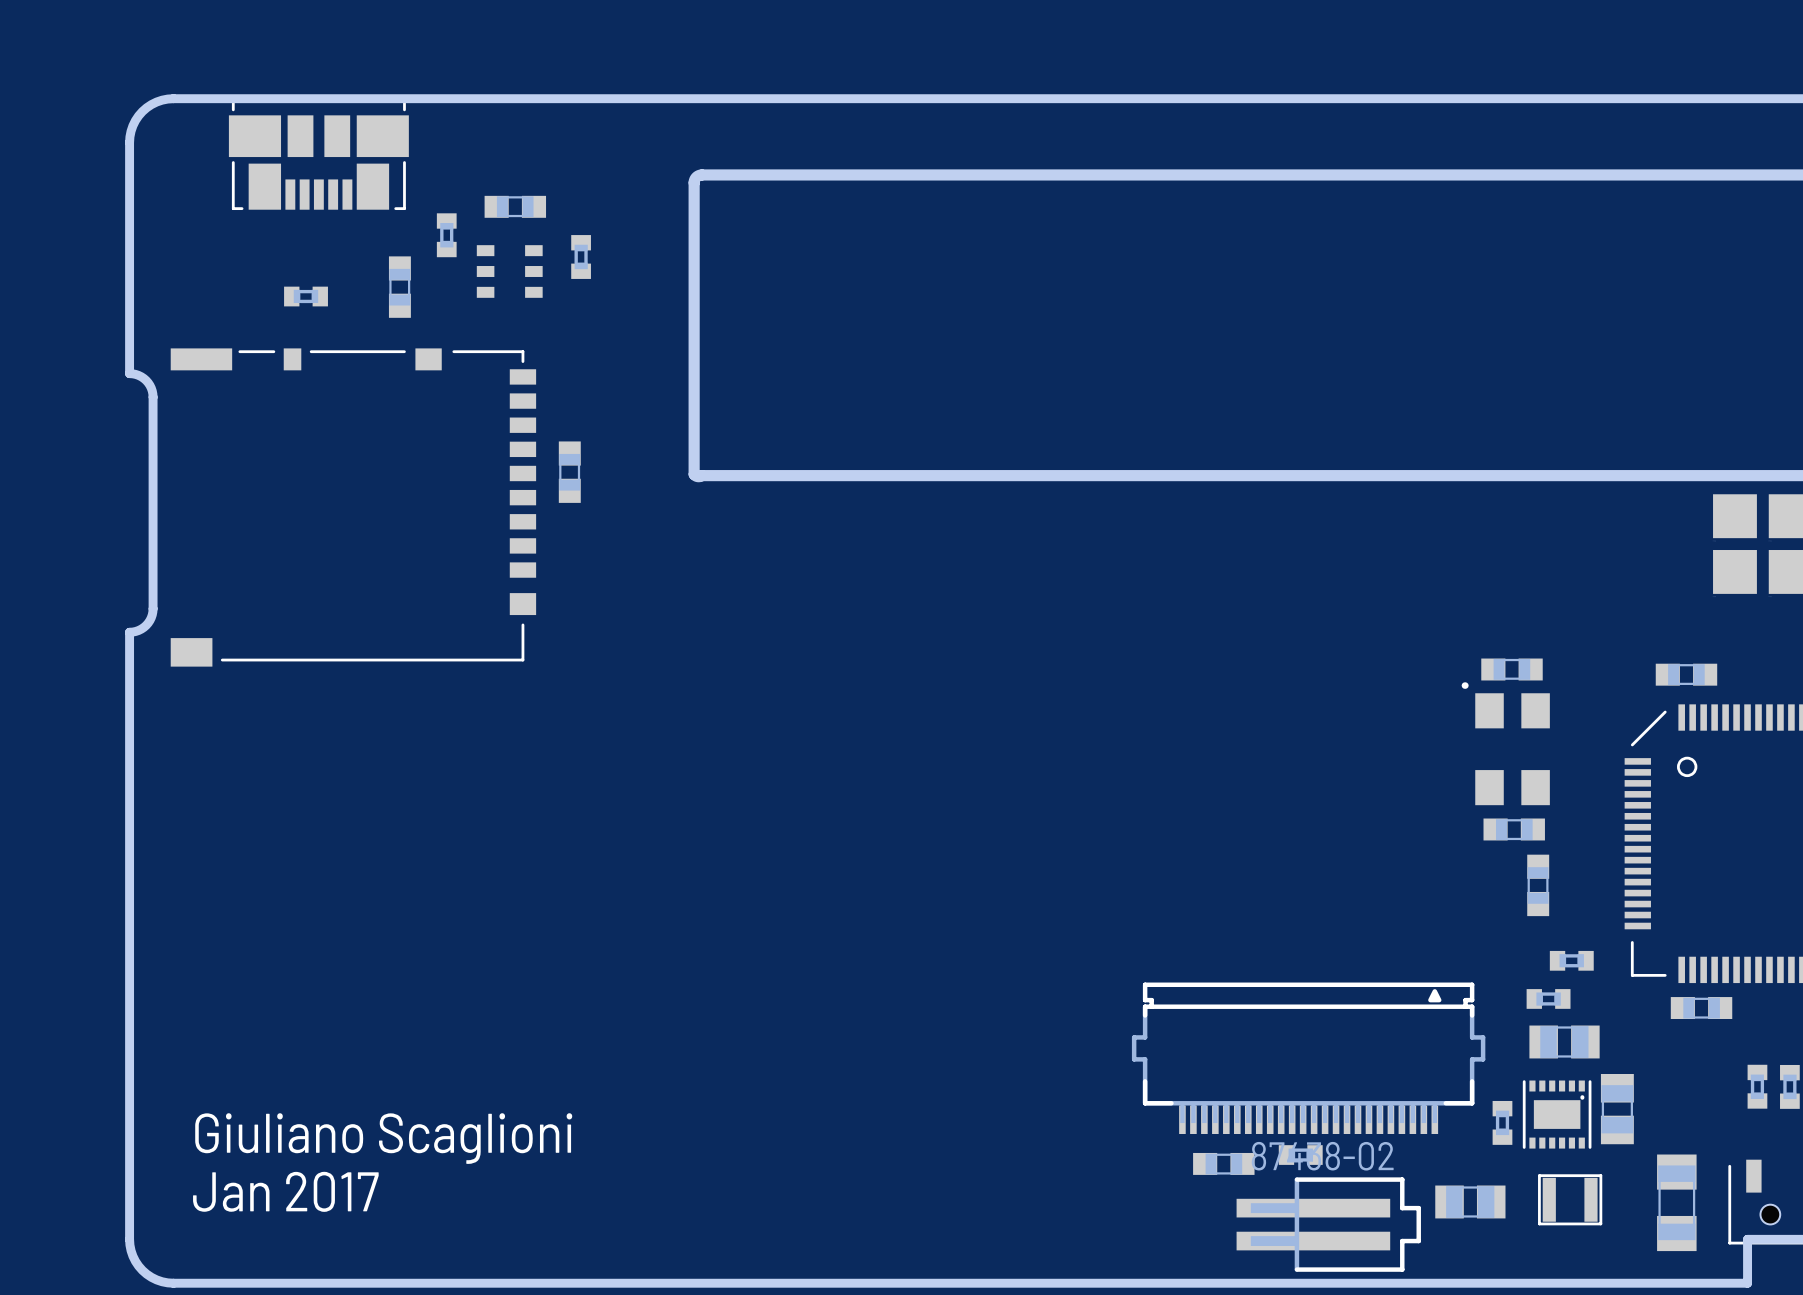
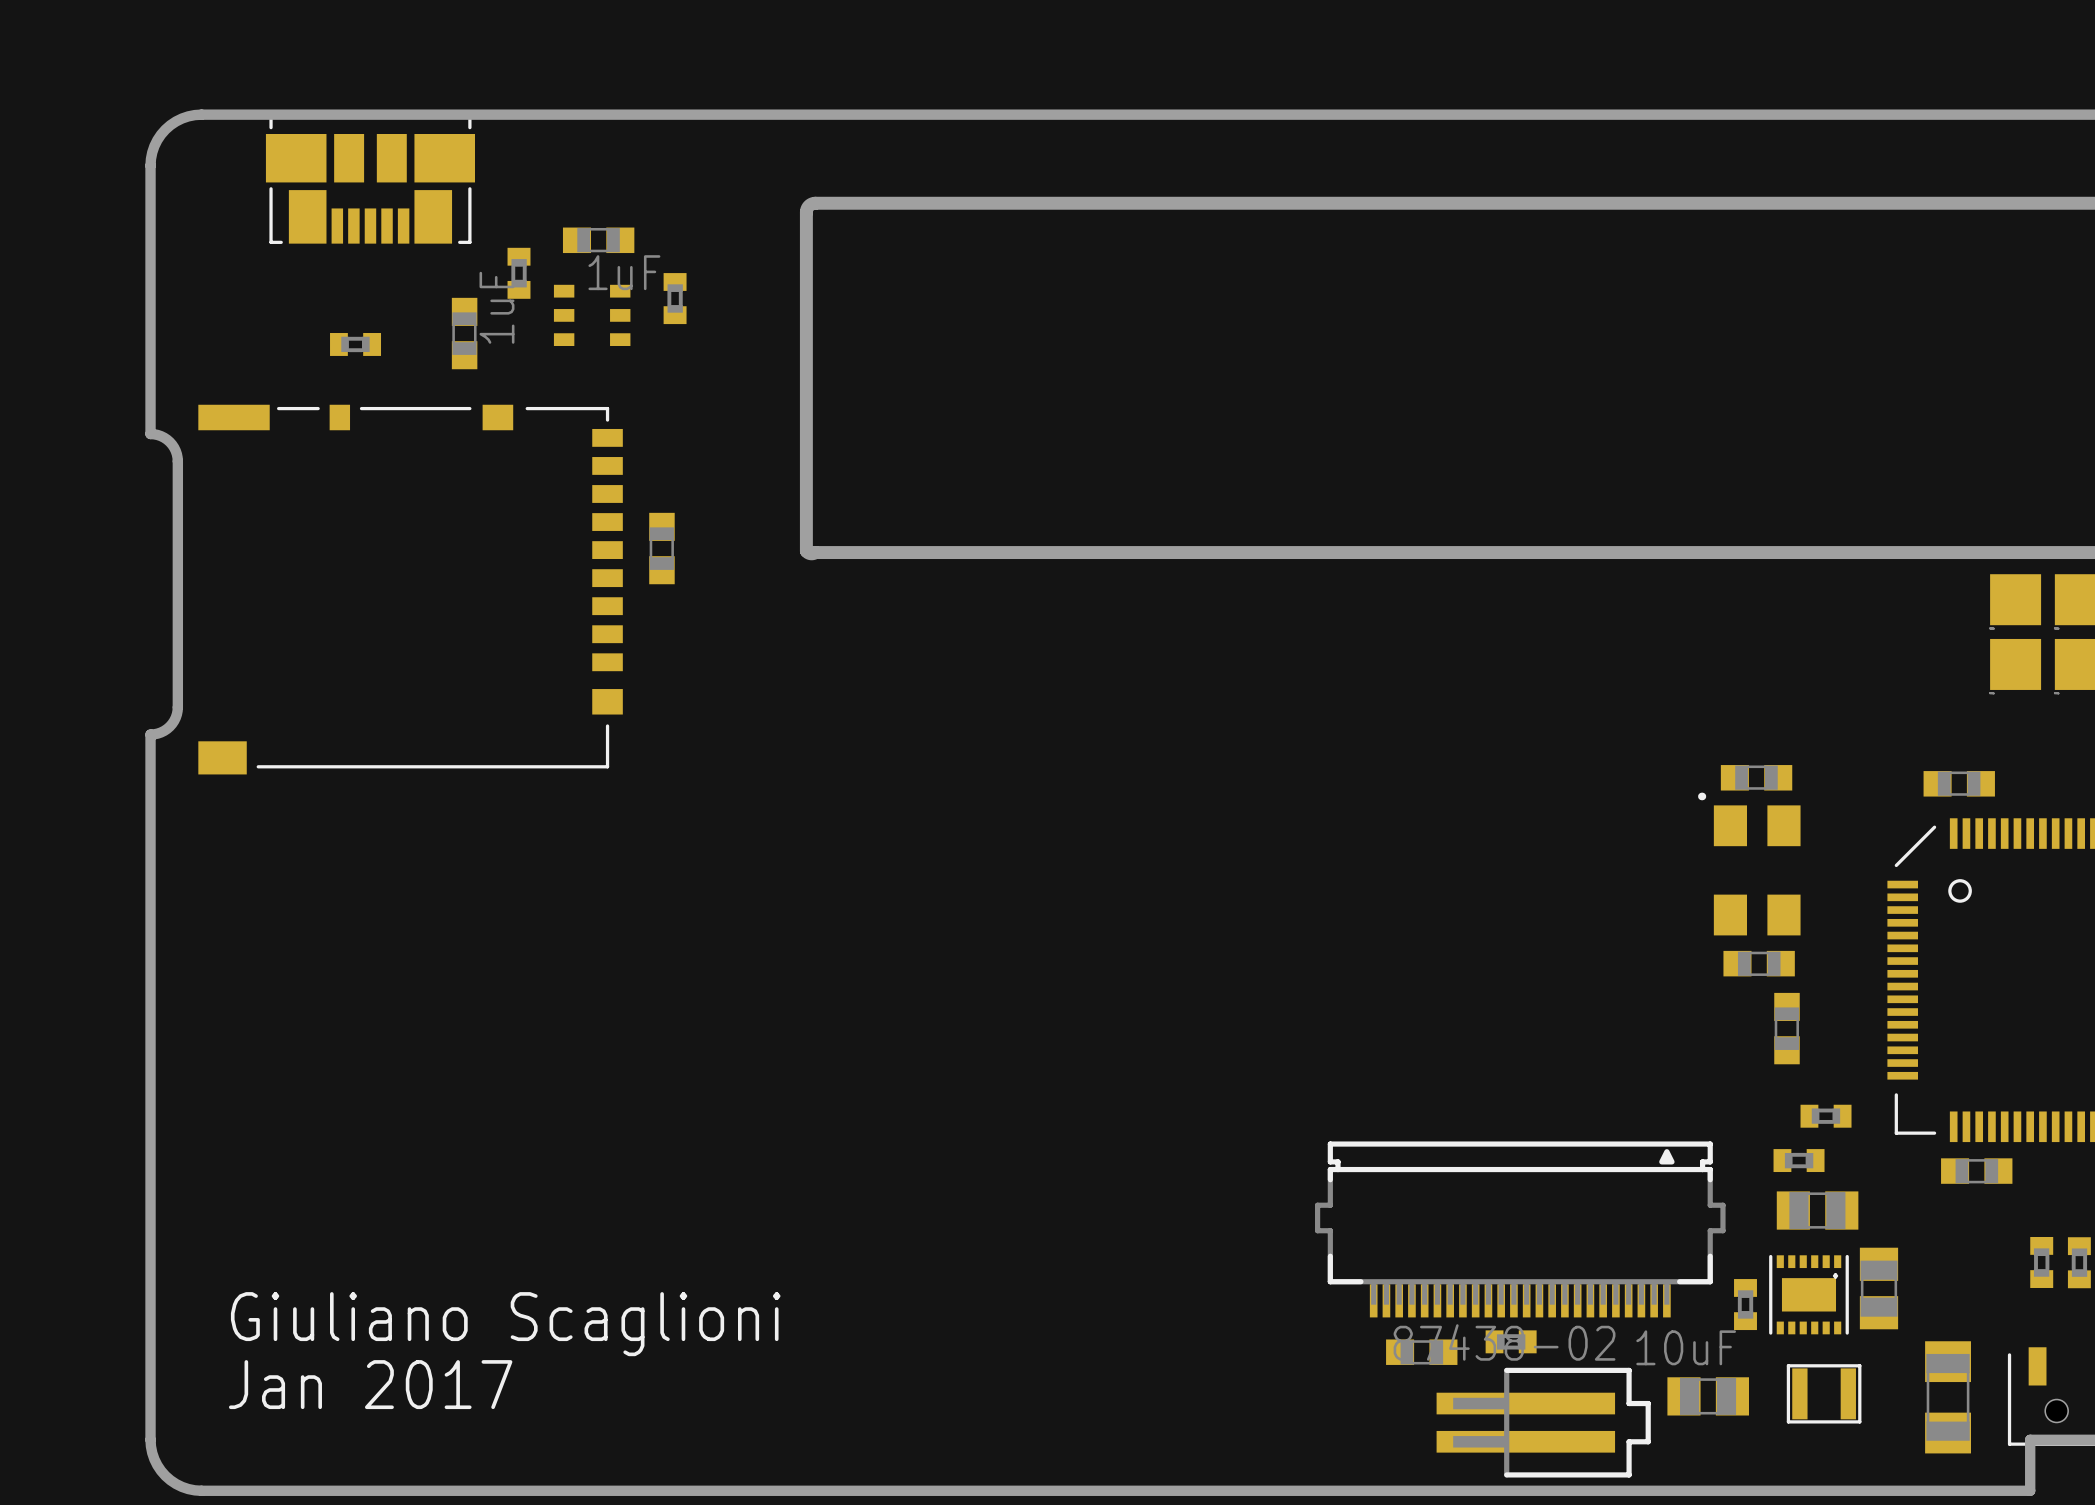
part value: none -> 1uF (624, 272)
part value: none -> 1uF (496, 307)
part value: none -> 10uF (1686, 1347)

